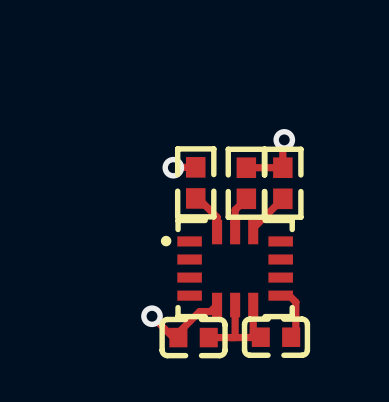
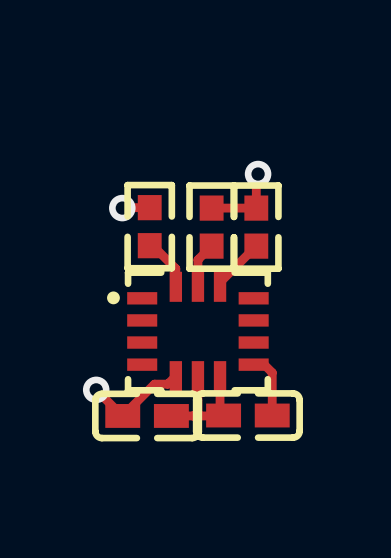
part footprint: [159, 316, 228, 359] -> [92, 390, 203, 442]
part footprint: [241, 316, 311, 358] -> [192, 390, 303, 441]

